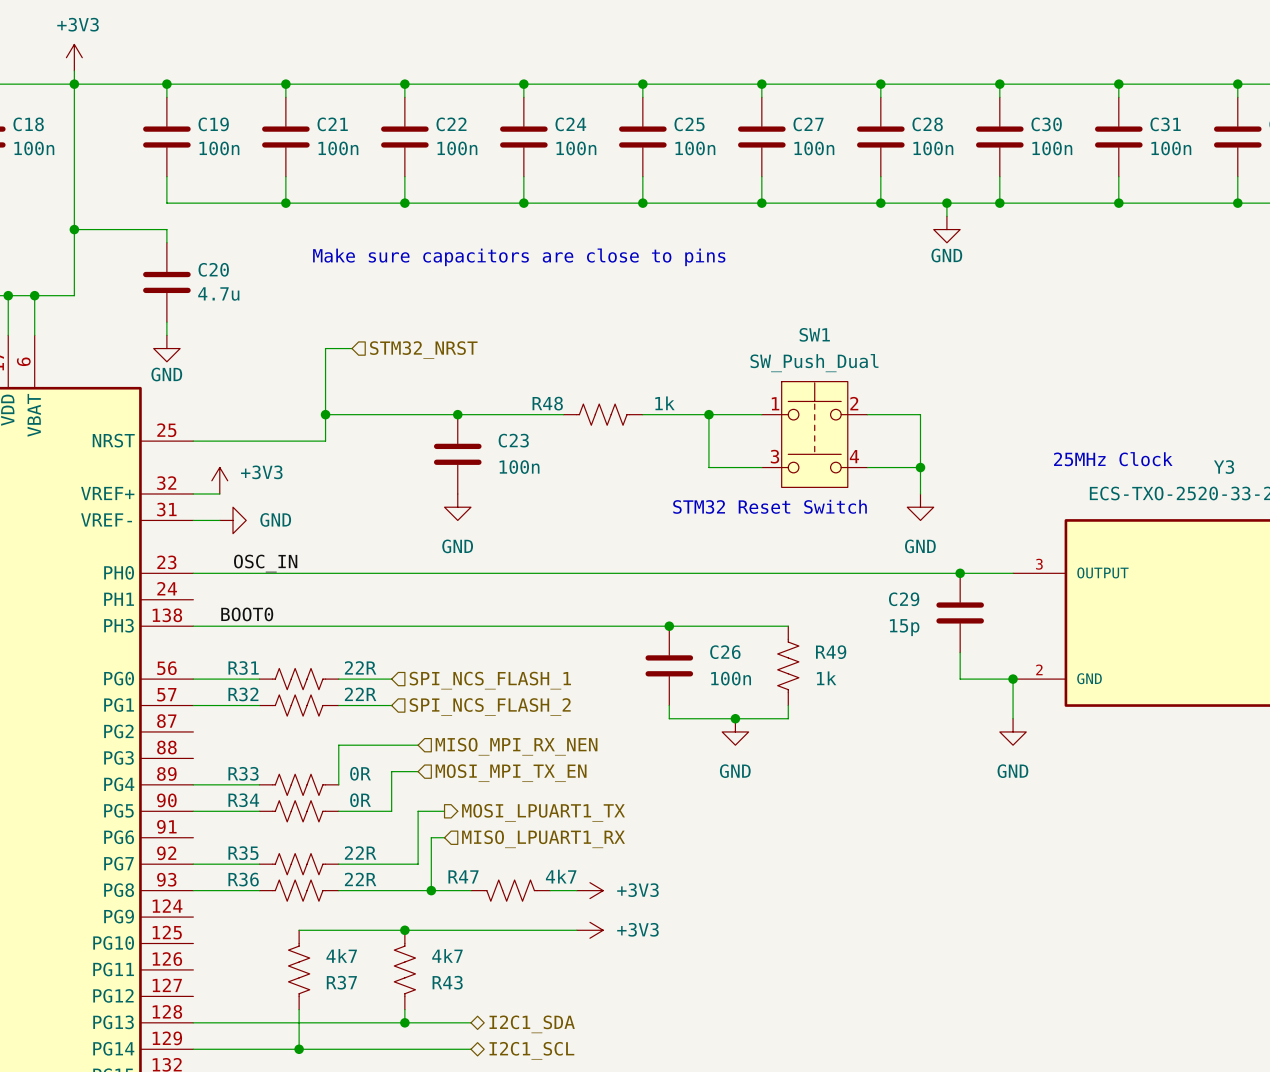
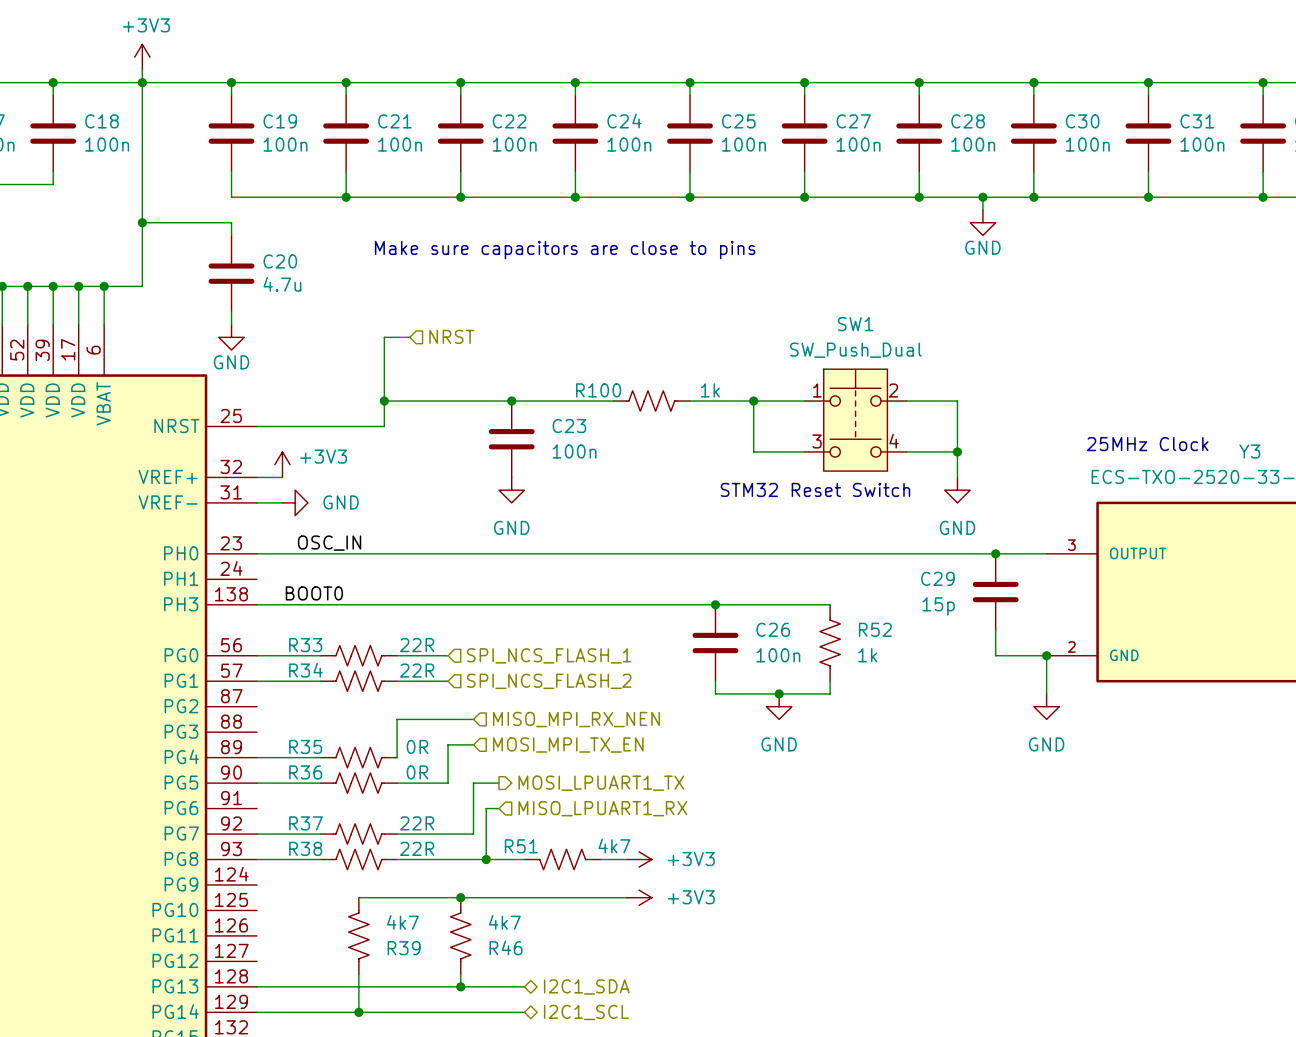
hierarchical label: STM32_NRST (423, 350) -> NRST (451, 336)
R48 name: R48 (547, 403) -> R100 (598, 390)
R49 name: R49 (831, 652) -> R52 (875, 629)
R31 name: R31 (243, 668) -> R33 (305, 645)
R32 name: R32 (243, 694) -> R34 (305, 670)
R33 name: R33 (243, 773) -> R35 (305, 746)
R34 name: R34 (243, 800) -> R36 (305, 772)
R35 name: R35 (243, 853) -> R37 (305, 823)
R47 name: R47 (463, 876) -> R51 (521, 846)
R36 name: R36 (243, 879) -> R38 (305, 848)
R37 name: R37 (341, 982) -> R39 (404, 948)
R43 name: R43 (447, 982) -> R46 (506, 947)

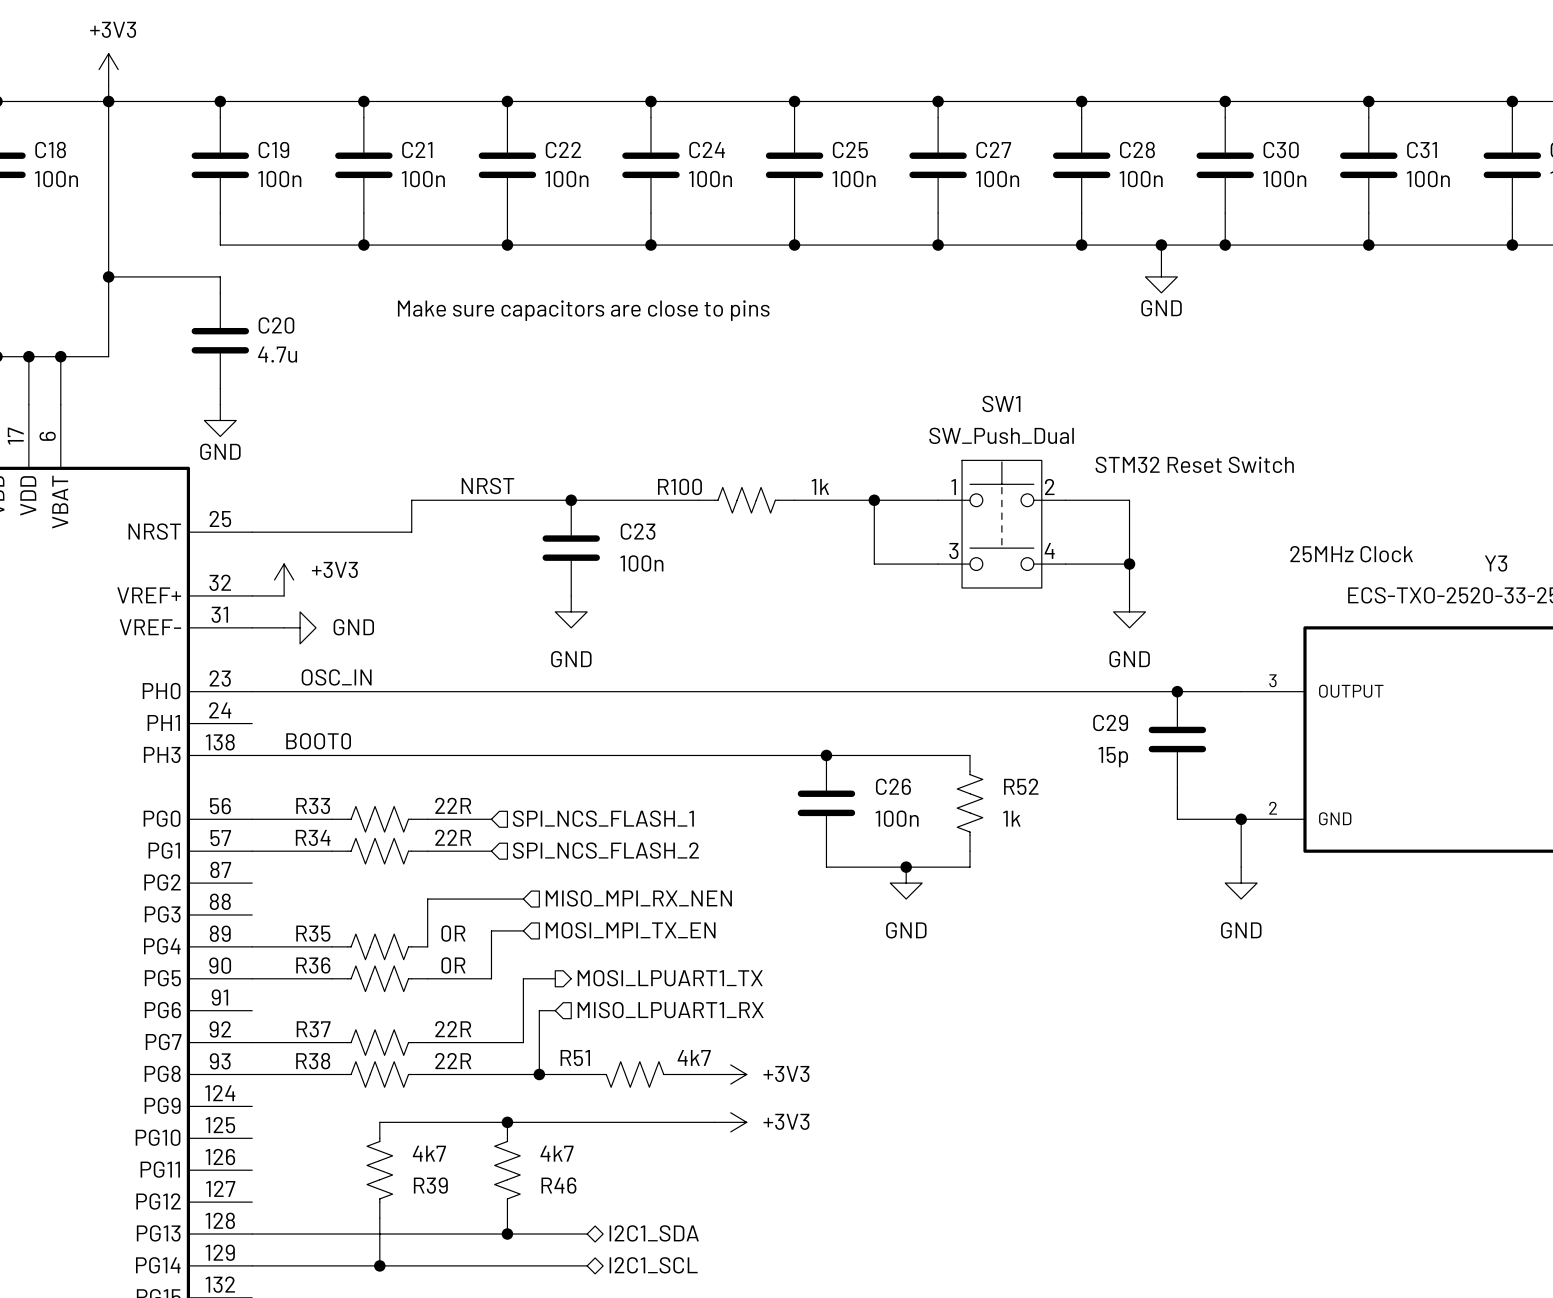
hierarchical label: NRST (451, 336) -> none
wire: (409, 337) (384, 337) (384, 401) -> none
label: none -> NRST (487, 486)
junction: (384, 401) -> none
text position: STM32 Reset Switch (815, 489) -> STM32 Reset Switch (1194, 464)

